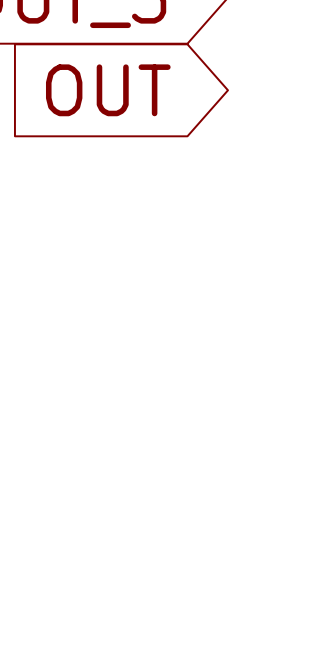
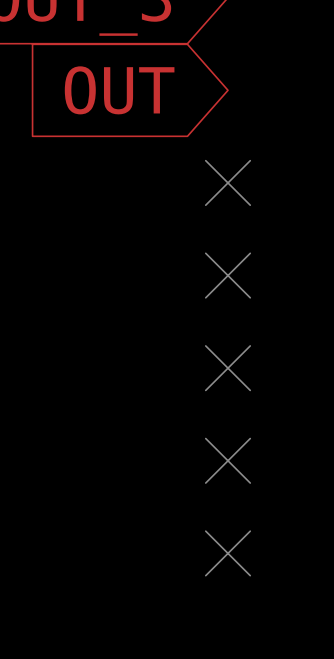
no-connect mark: none -> (228, 182)
no-connect mark: none -> (228, 275)
no-connect mark: none -> (228, 368)
no-connect mark: none -> (228, 460)
no-connect mark: none -> (228, 553)

